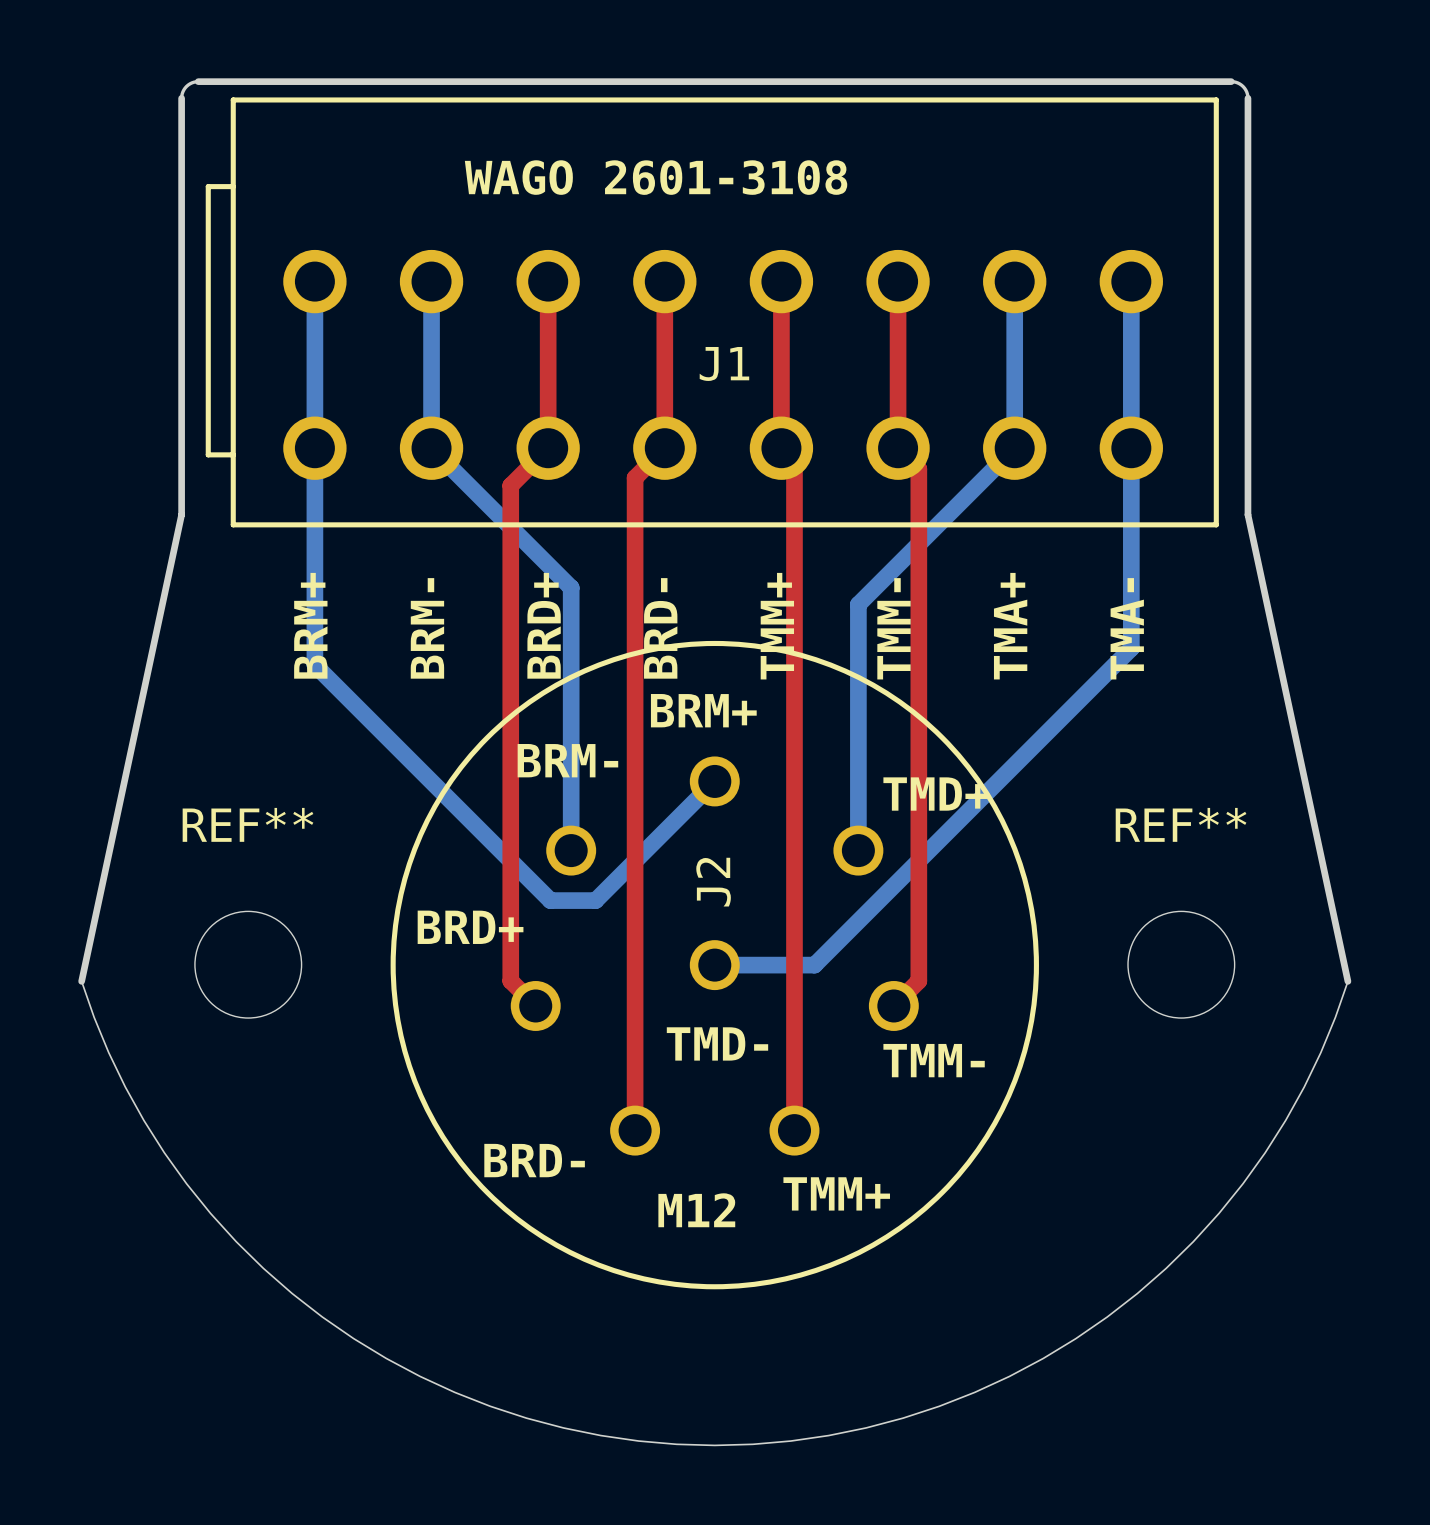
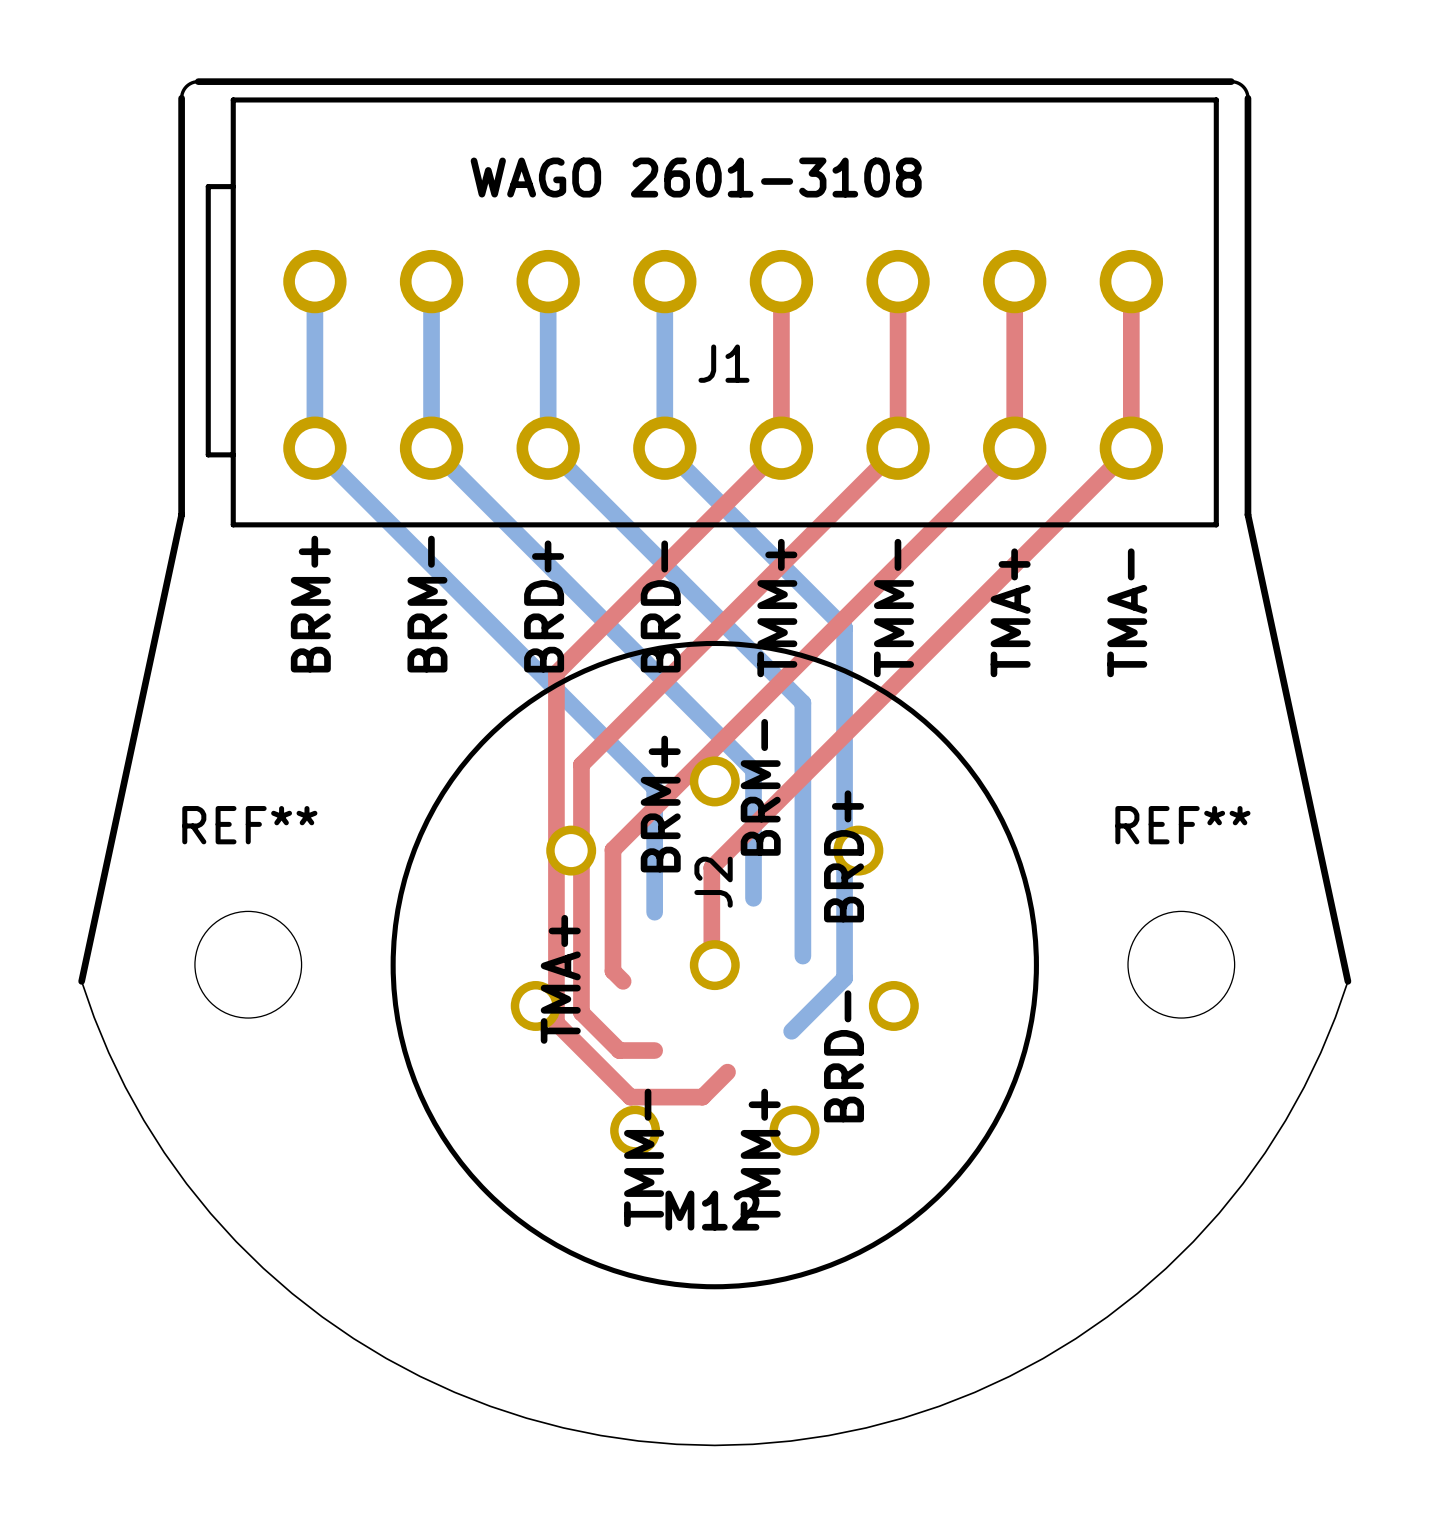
bottom track: none -> (548, 281) (548, 448) (802, 702) (802, 956)
top track: (548, 281) (548, 448) (510, 485) (510, 981) (535, 1005) -> none
bottom track: none -> (664, 281) (664, 448) (844, 627) (844, 978) (791, 1031)
top track: (664, 281) (664, 448) (635, 477) (635, 1130) -> none
bottom track: (1014, 281) (1014, 448) (858, 604) (858, 850) -> none
top track: none -> (1014, 281) (1014, 448) (612, 849) (612, 971) (623, 981)
bottom track: (1131, 281) (1131, 648) (814, 965) (714, 965) -> none
top track: none -> (1131, 281) (1131, 448) (711, 867) (711, 978) (714, 981)
bottom track: (314, 448) (314, 665) (550, 900) (595, 900) (714, 781) -> (314, 448) (654, 787) (654, 912)
top track: (781, 448) (794, 461) (794, 1130) -> (781, 448) (556, 673) (556, 1023) (630, 1097) (702, 1097) (727, 1072)
top track: (898, 448) (918, 468) (918, 981) (893, 1005) -> (898, 448) (581, 764) (581, 1012) (619, 1050) (654, 1050)
bottom track: (571, 587) (571, 850) -> (571, 587) (753, 770) (753, 898)
text rotation: 0° (703, 710) -> 90° counterclockwise (660, 804)
text rotation: 0° (567, 760) -> 90° counterclockwise (760, 787)
text: TMD+ (936, 794) -> none
text rotation: 0° (470, 927) -> 90° counterclockwise (844, 856)
text position: BRD+ (470, 927) -> BRD+ (844, 856)
text: none -> TMA+ (560, 979)
text: TMD- (717, 1043) -> none
text rotation: 0° (934, 1060) -> 90° counterclockwise (644, 1157)
text position: TMM- (934, 1060) -> TMM- (644, 1157)
text rotation: 0° (534, 1160) -> 90° counterclockwise (844, 1056)
text position: BRD- (534, 1160) -> BRD- (844, 1056)
text rotation: 0° (836, 1193) -> 90° counterclockwise (760, 1157)

